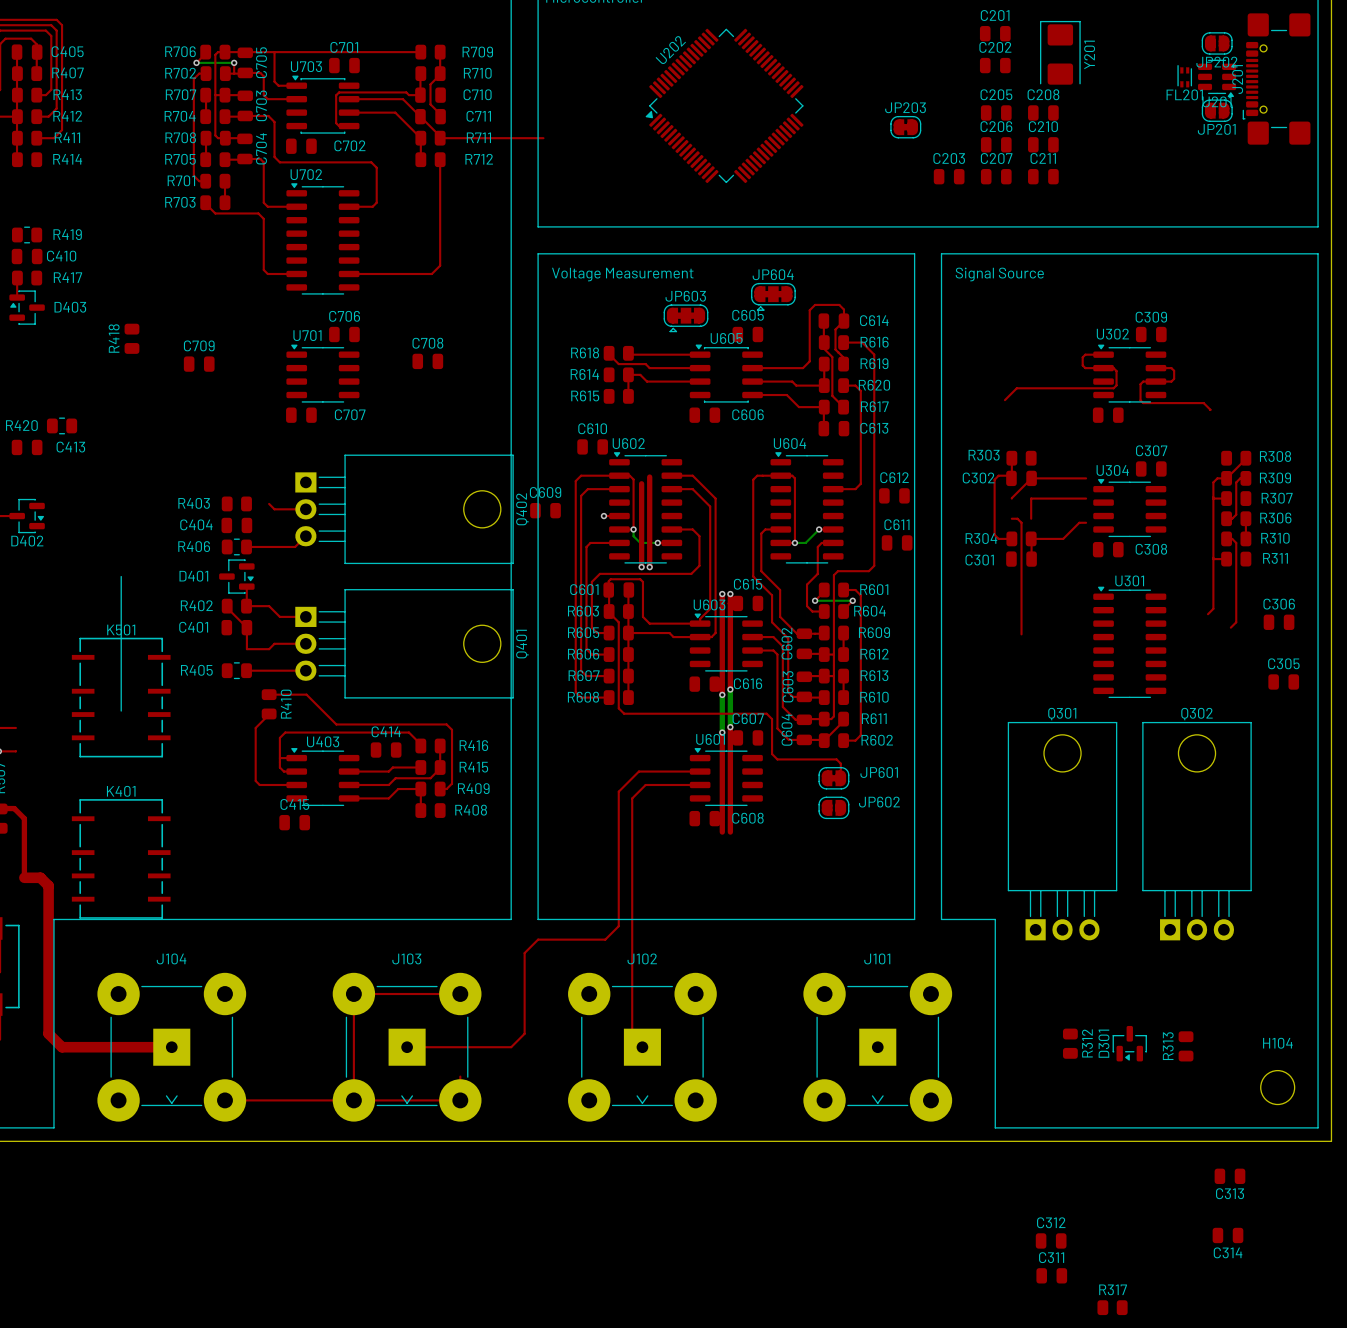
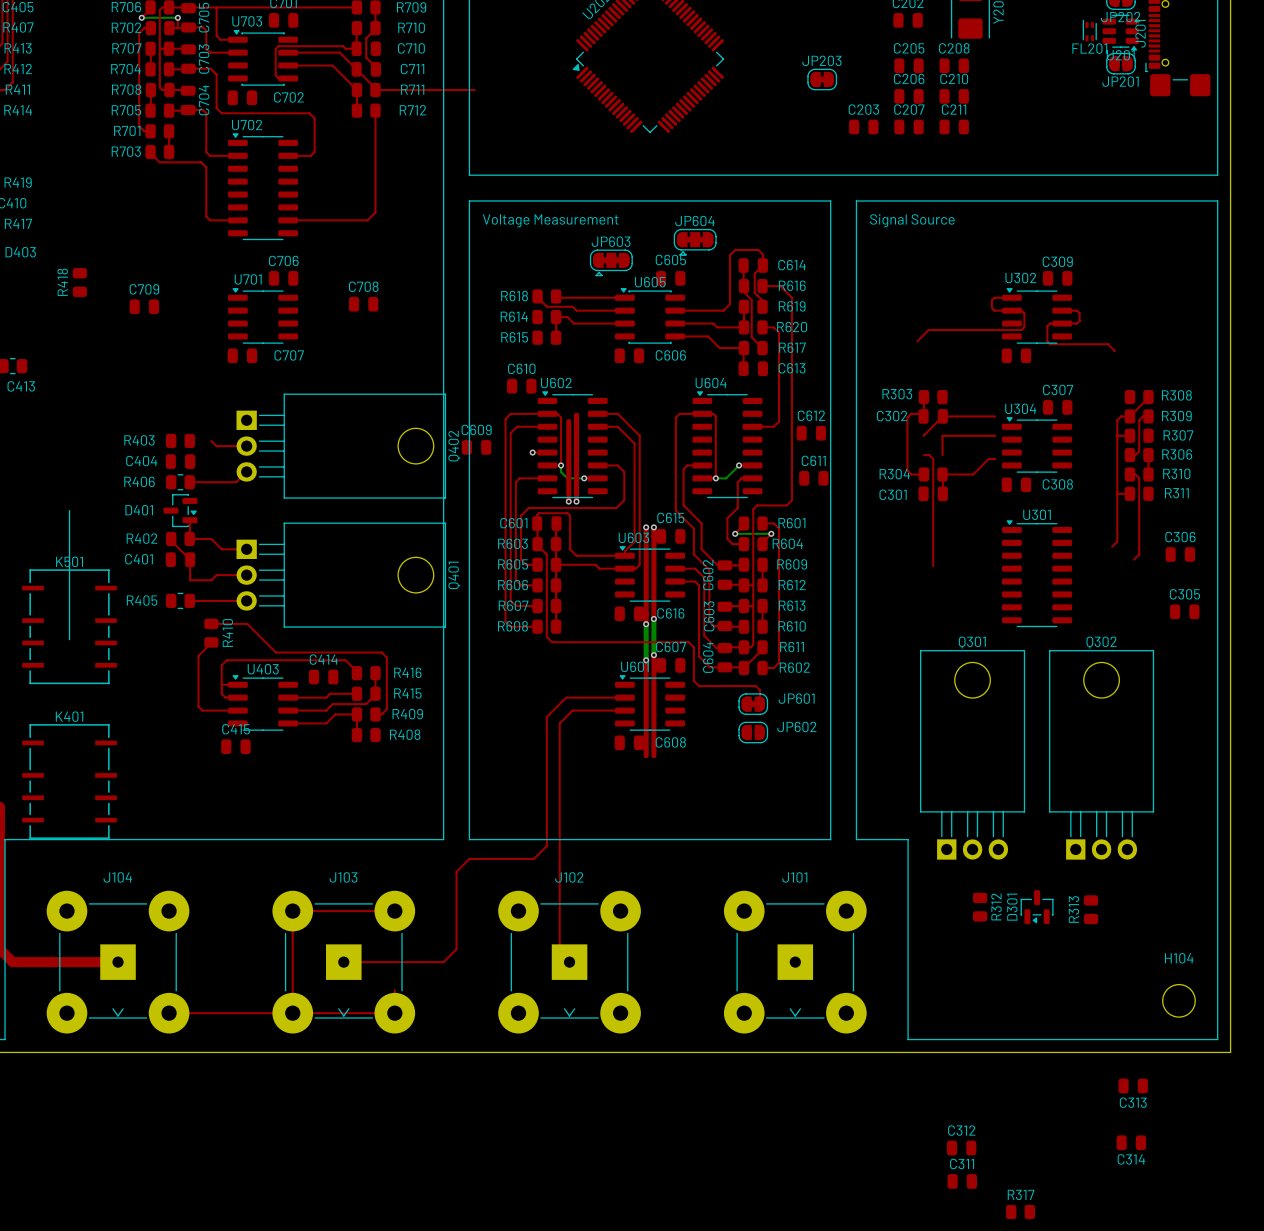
R312 position: (1070, 1043) -> (980, 907)
D301 position: (1129, 1043) -> (1037, 907)
R313 position: (1186, 1046) -> (1091, 909)

